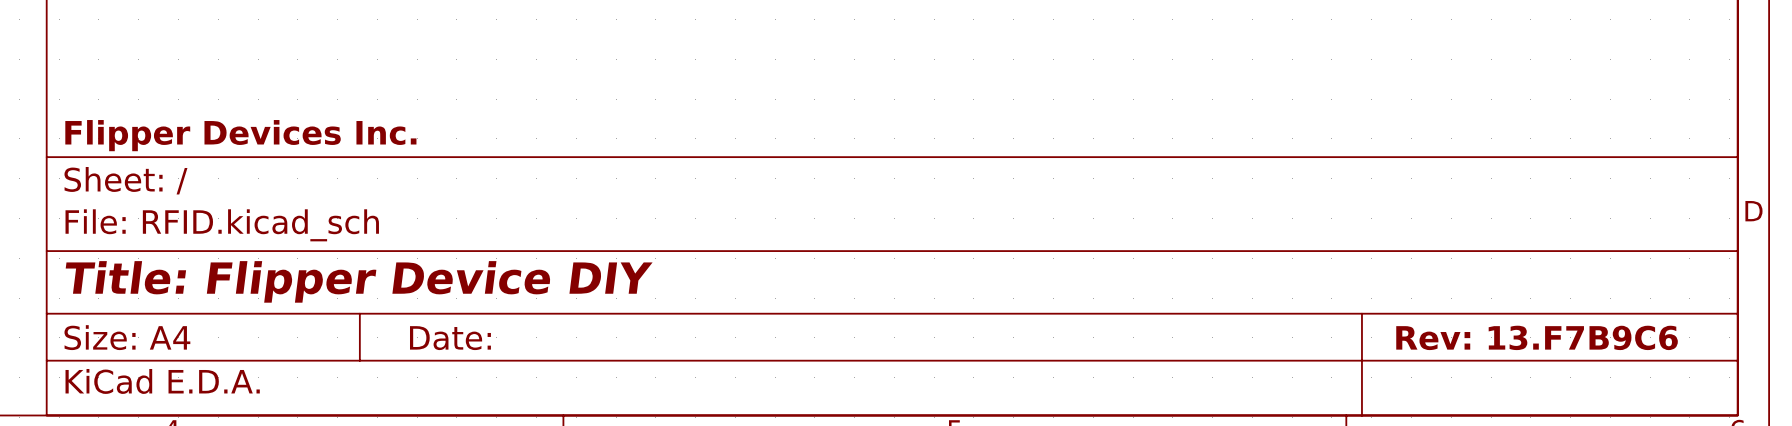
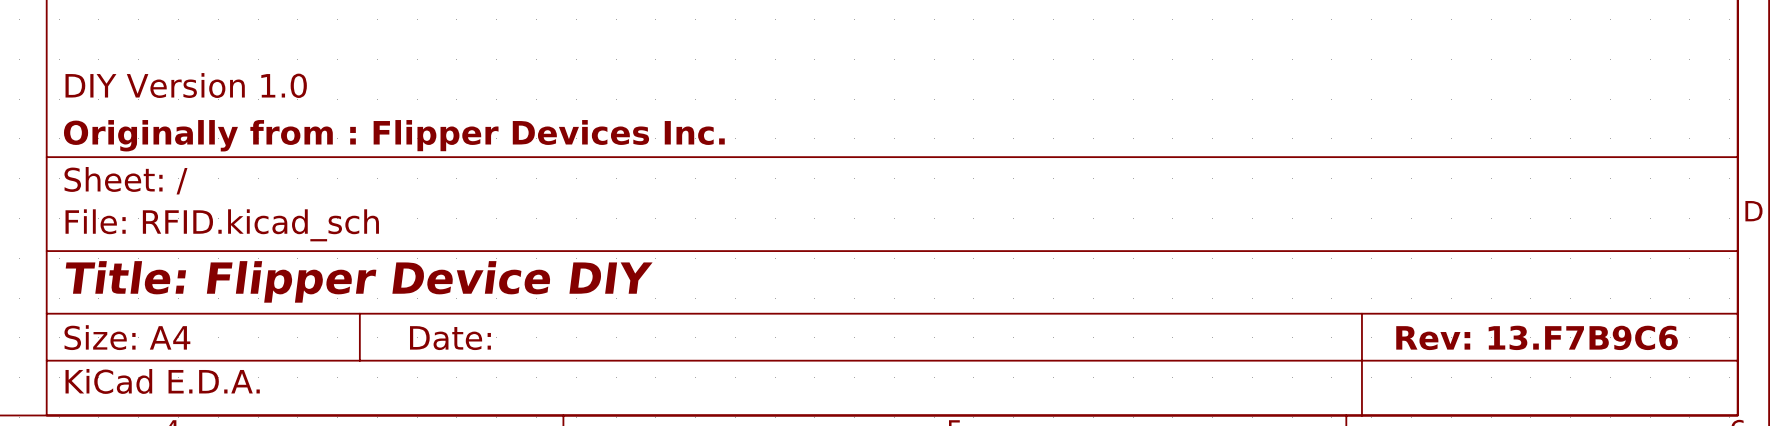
title block: none -> DIY Version 1.0 (186, 85)
title block: Flipper Devices Inc. (240, 135) -> Originally from : Flipper Devices Inc. (394, 135)

